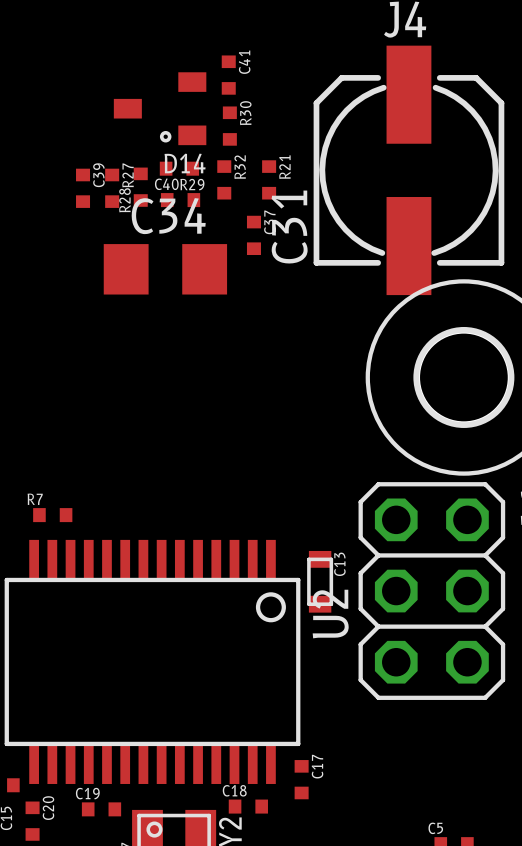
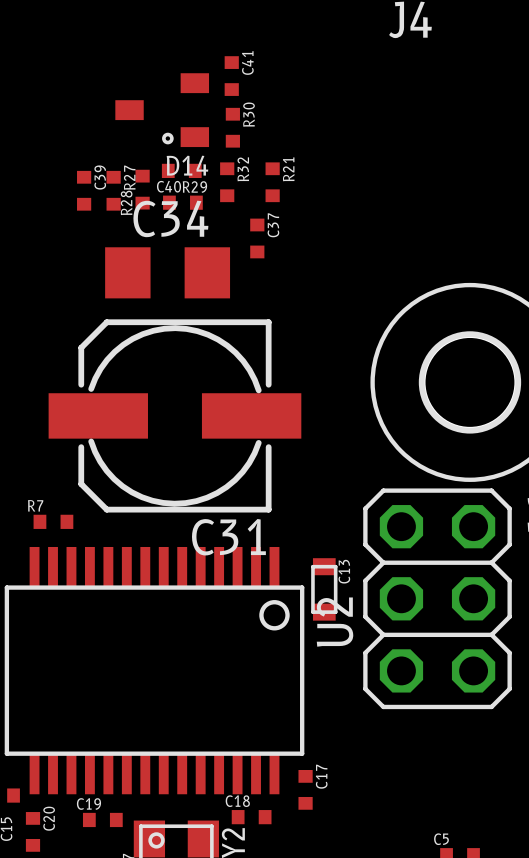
C31 rotation: 0° (408, 170) -> 90° counterclockwise (174, 415)
C31 position: (408, 170) -> (174, 415)

